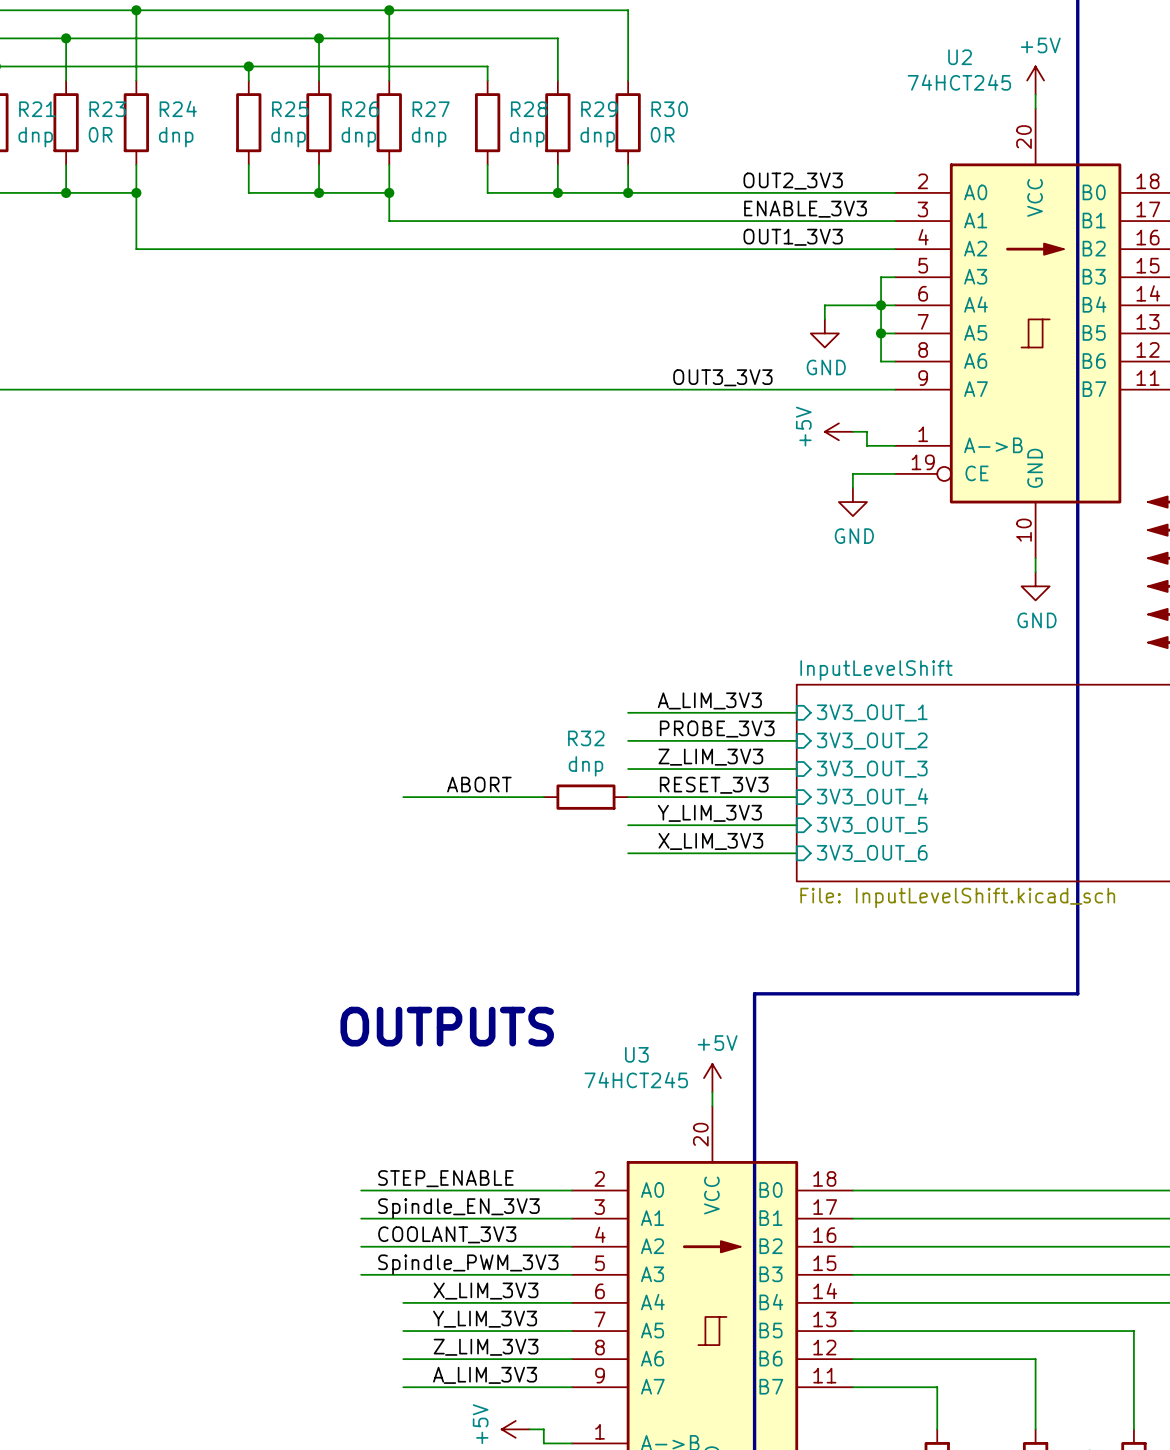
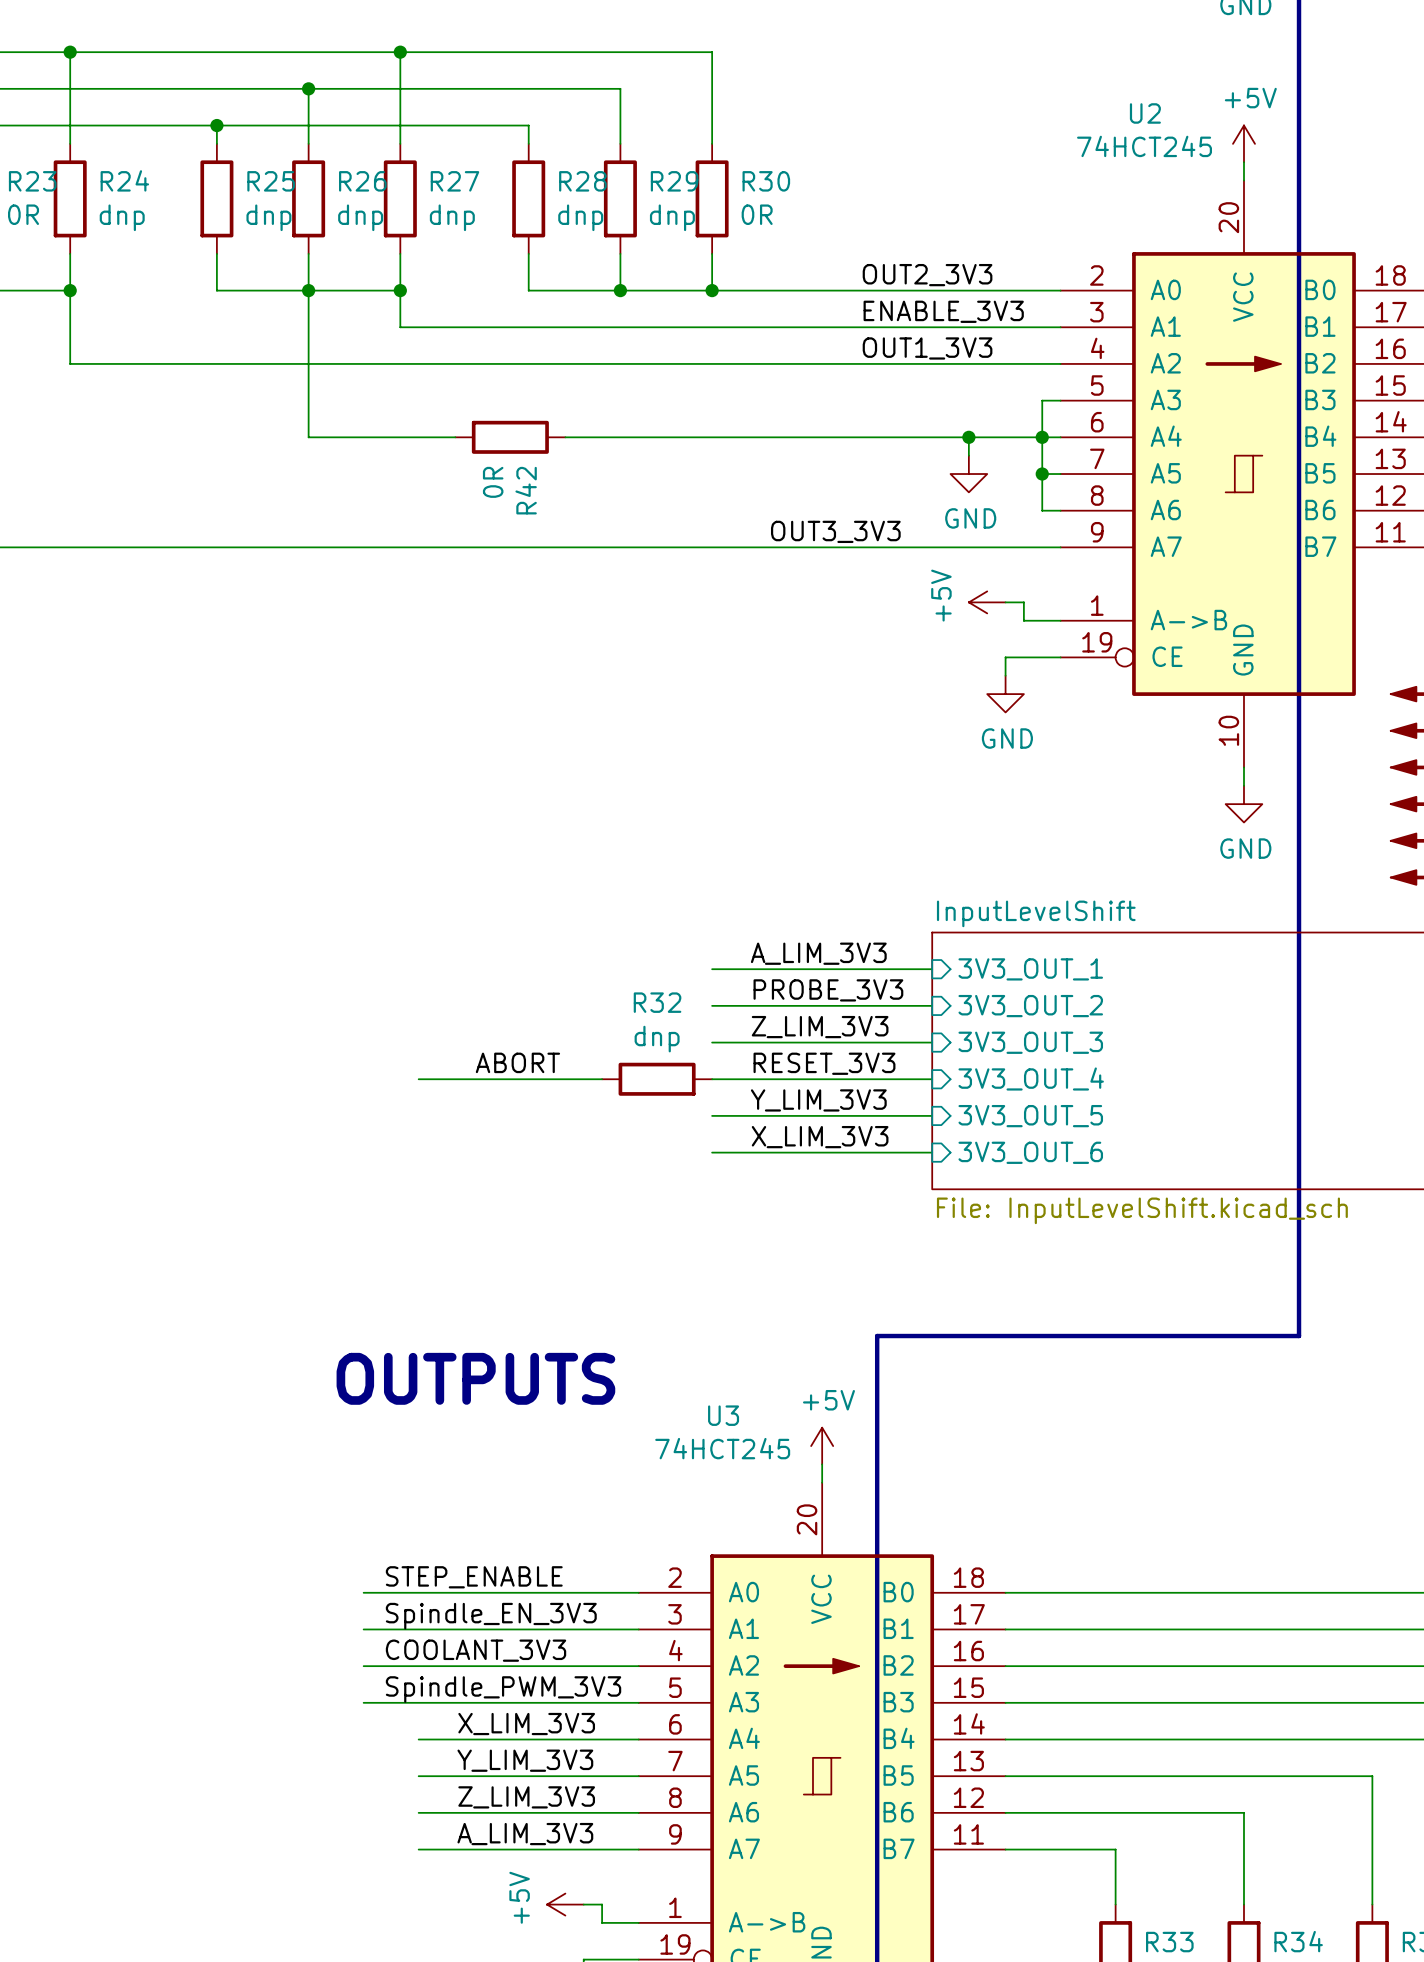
wire: none -> (308, 290) (308, 437) (455, 437)
R42: none -> 0R (510, 437)
wire: none -> (565, 437) (968, 437)
junction: none -> (968, 437)

